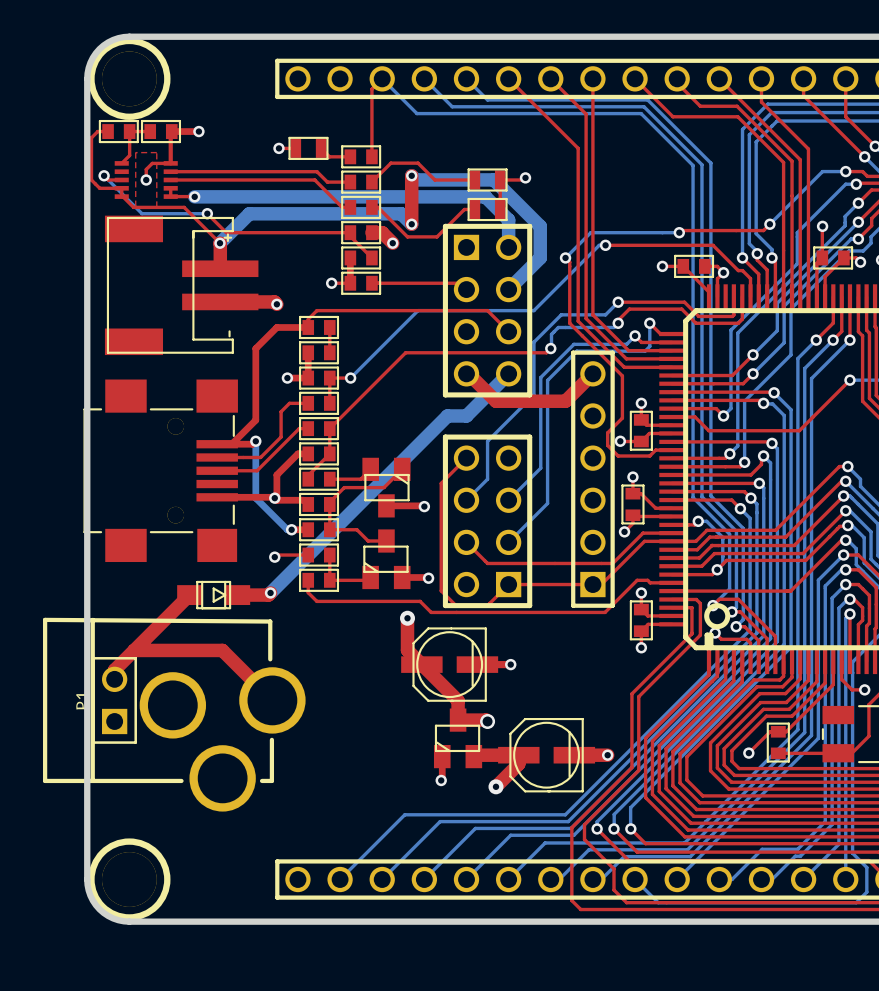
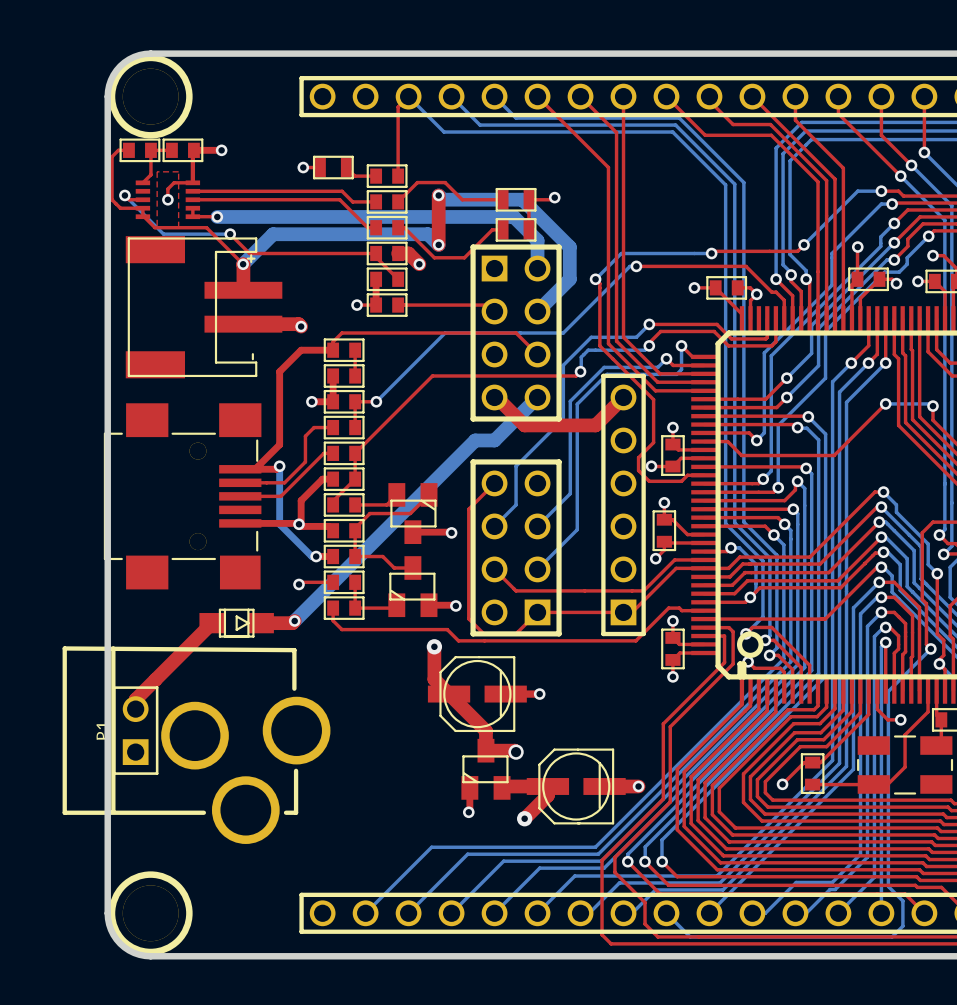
top track: (134, 650) (222, 650) (272, 700) -> none

